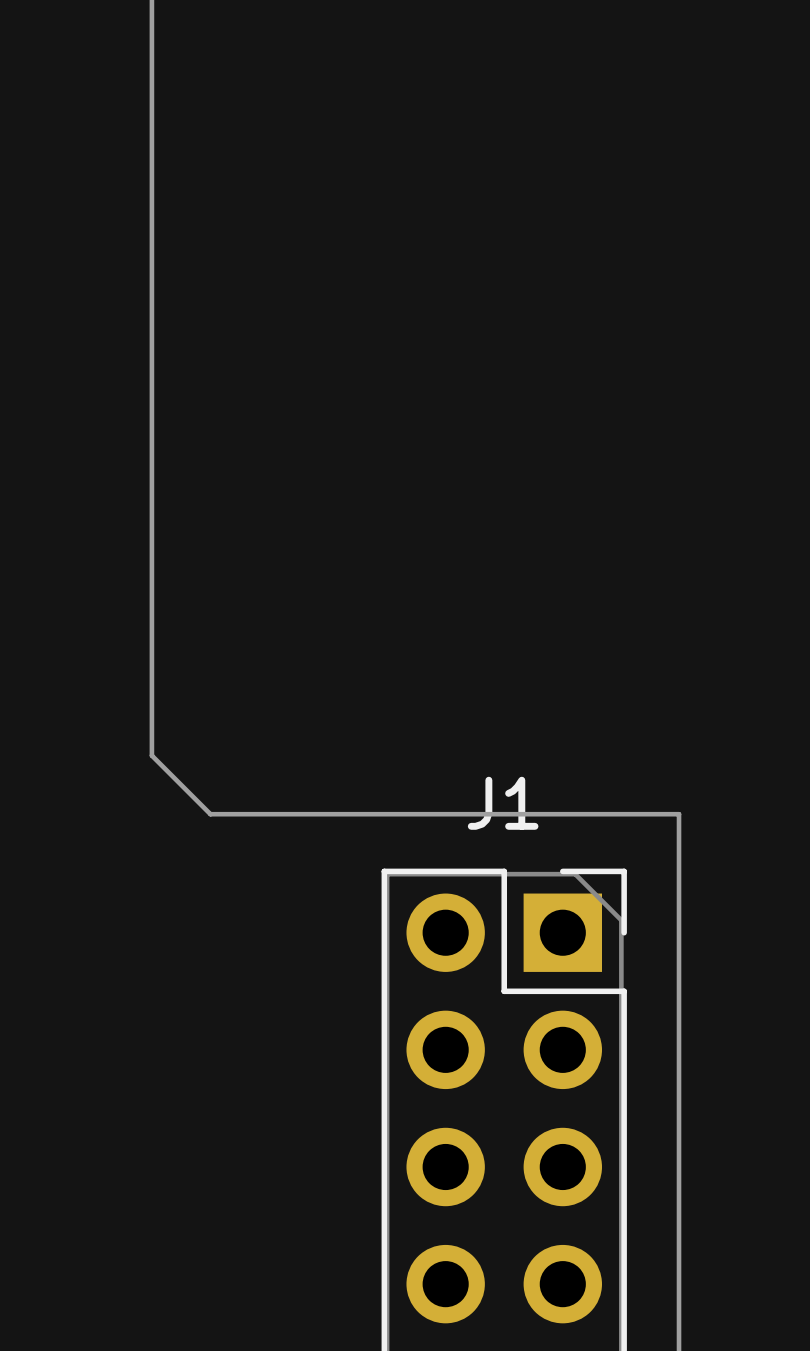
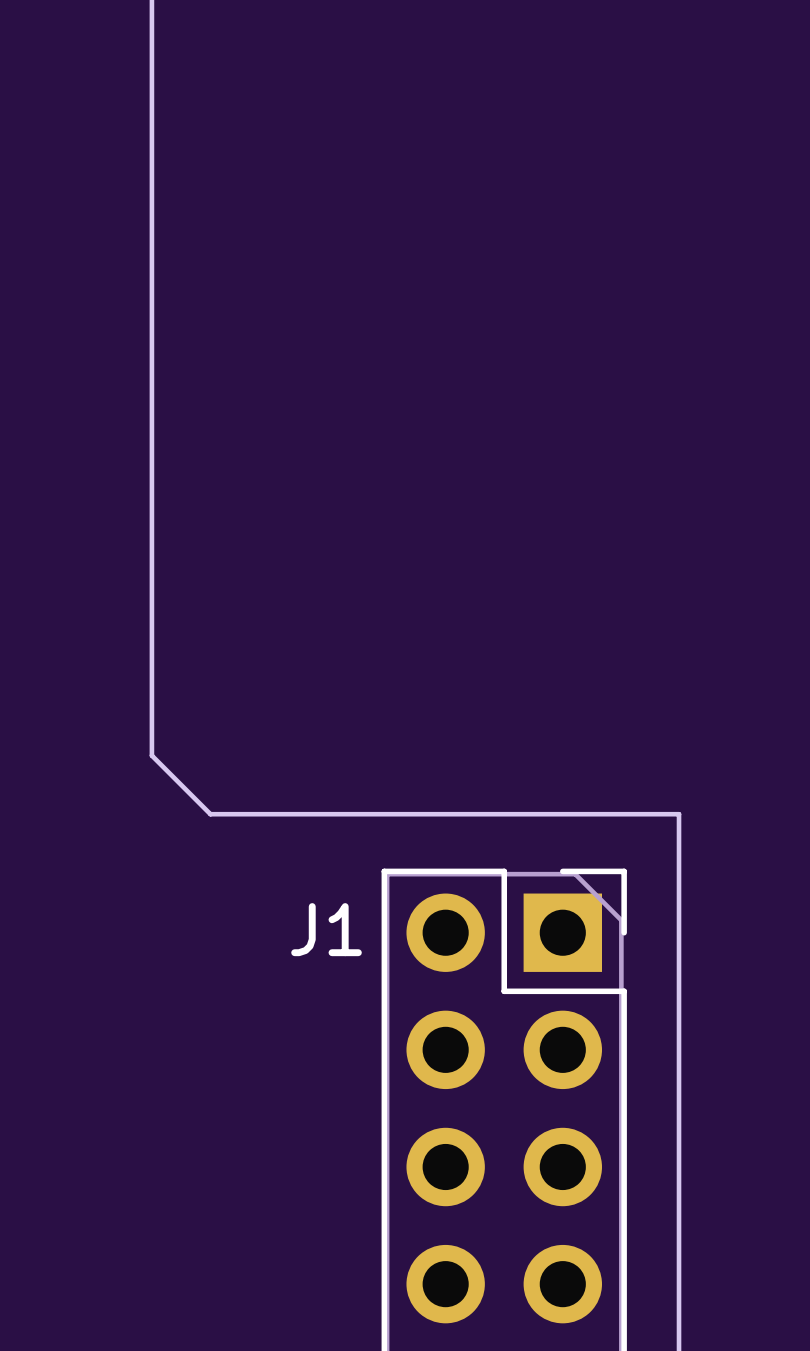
J1 name position: J1 (503, 803) -> J1 (326, 929)

